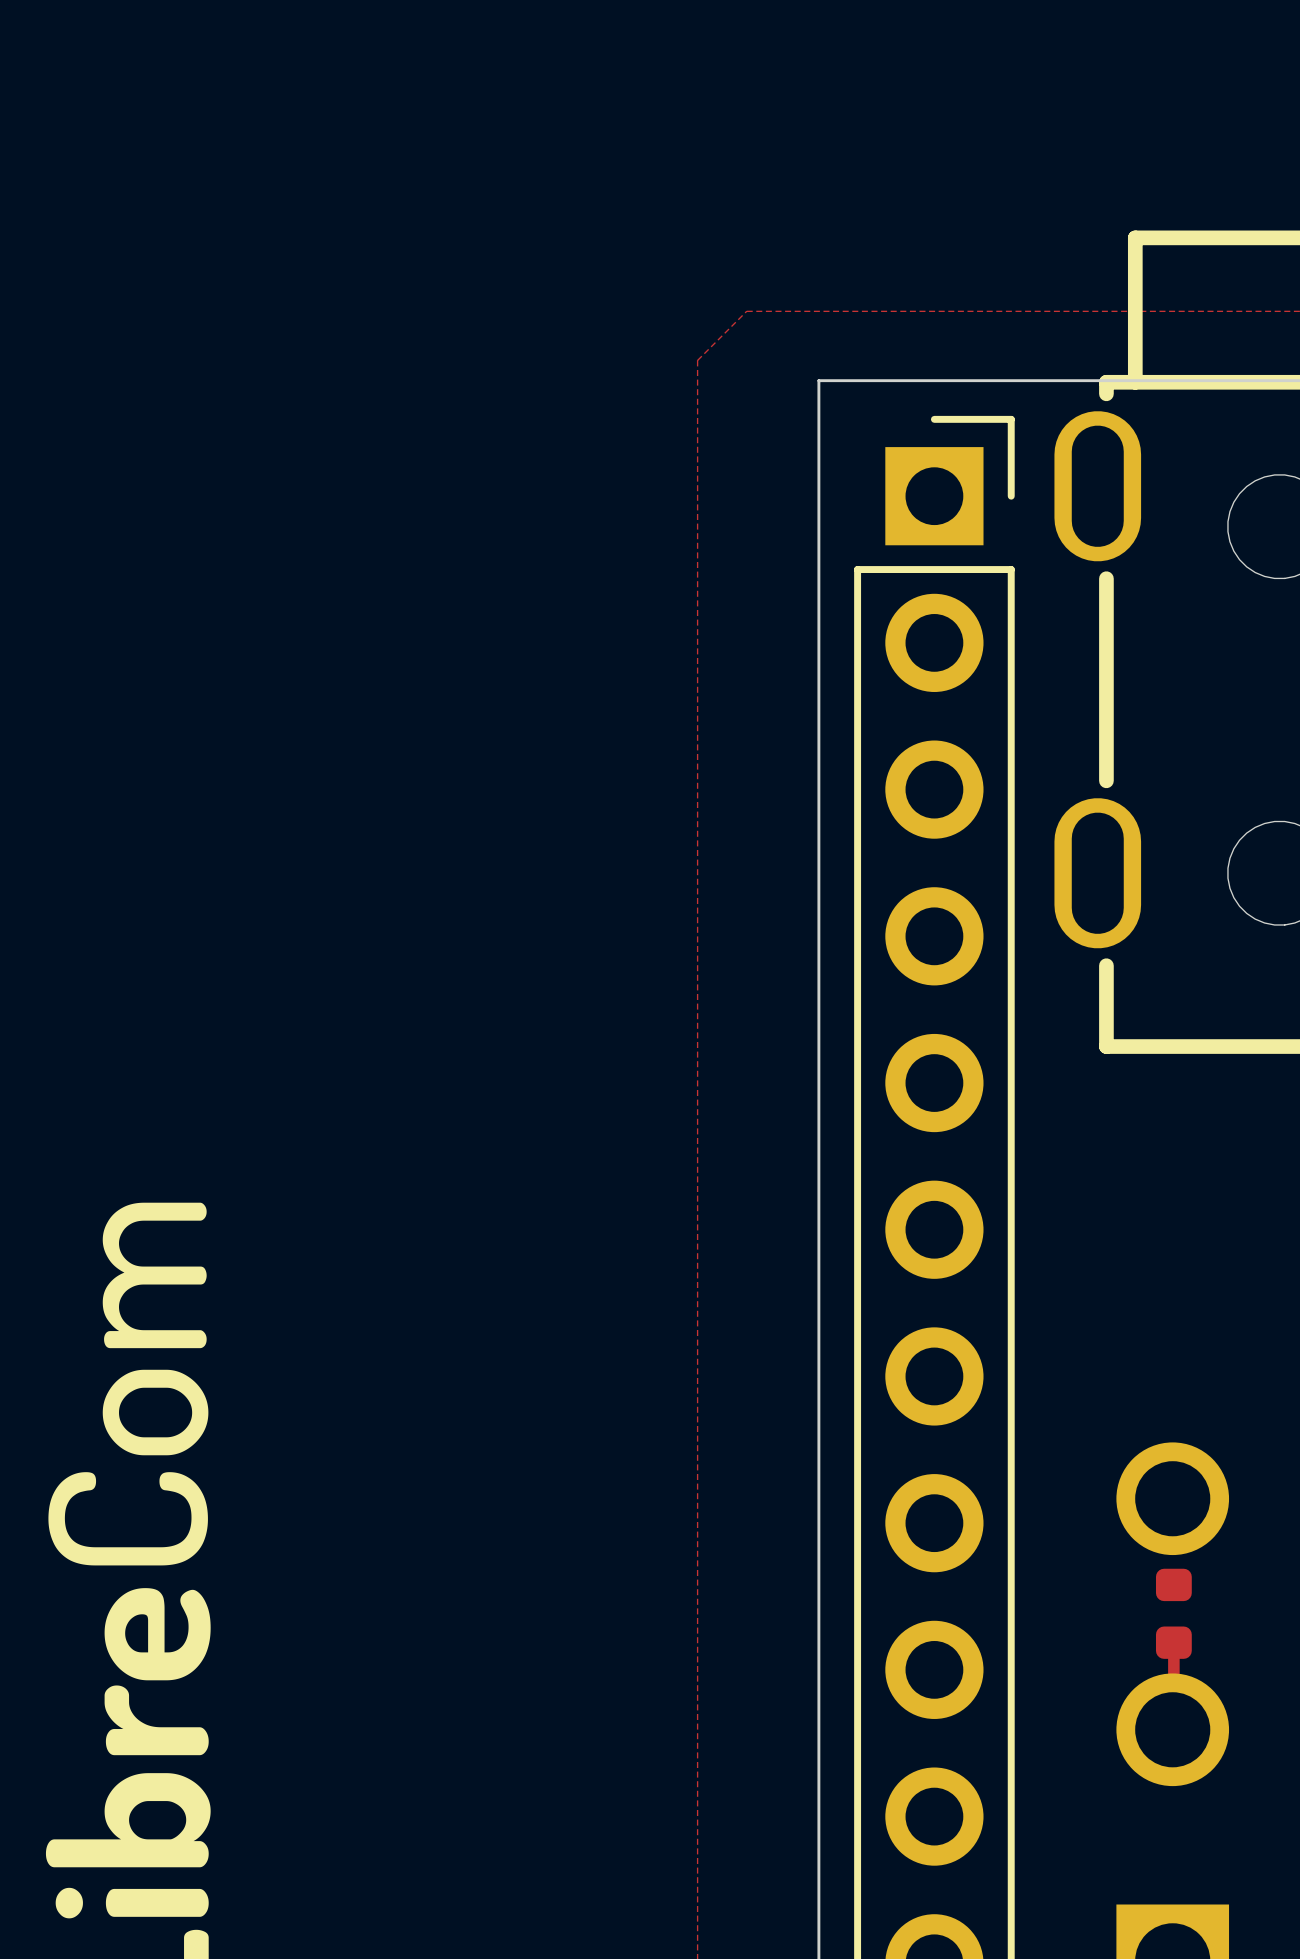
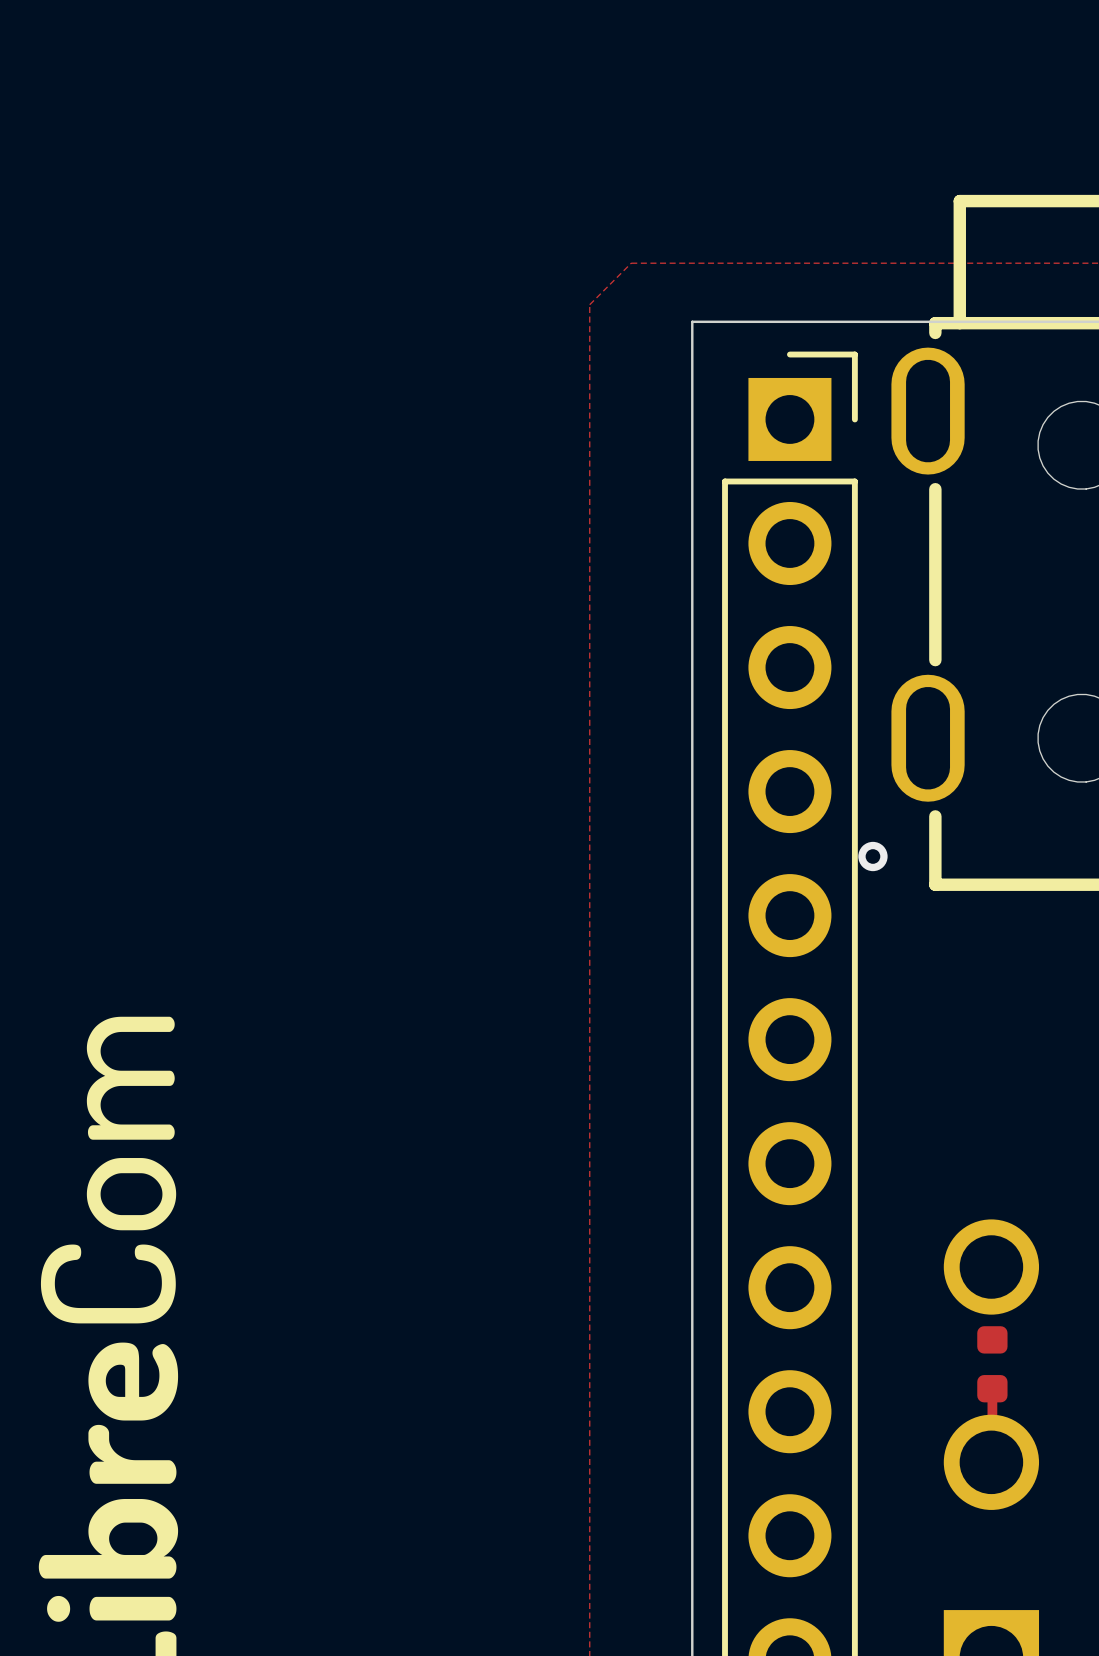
via: none -> (872, 856)

